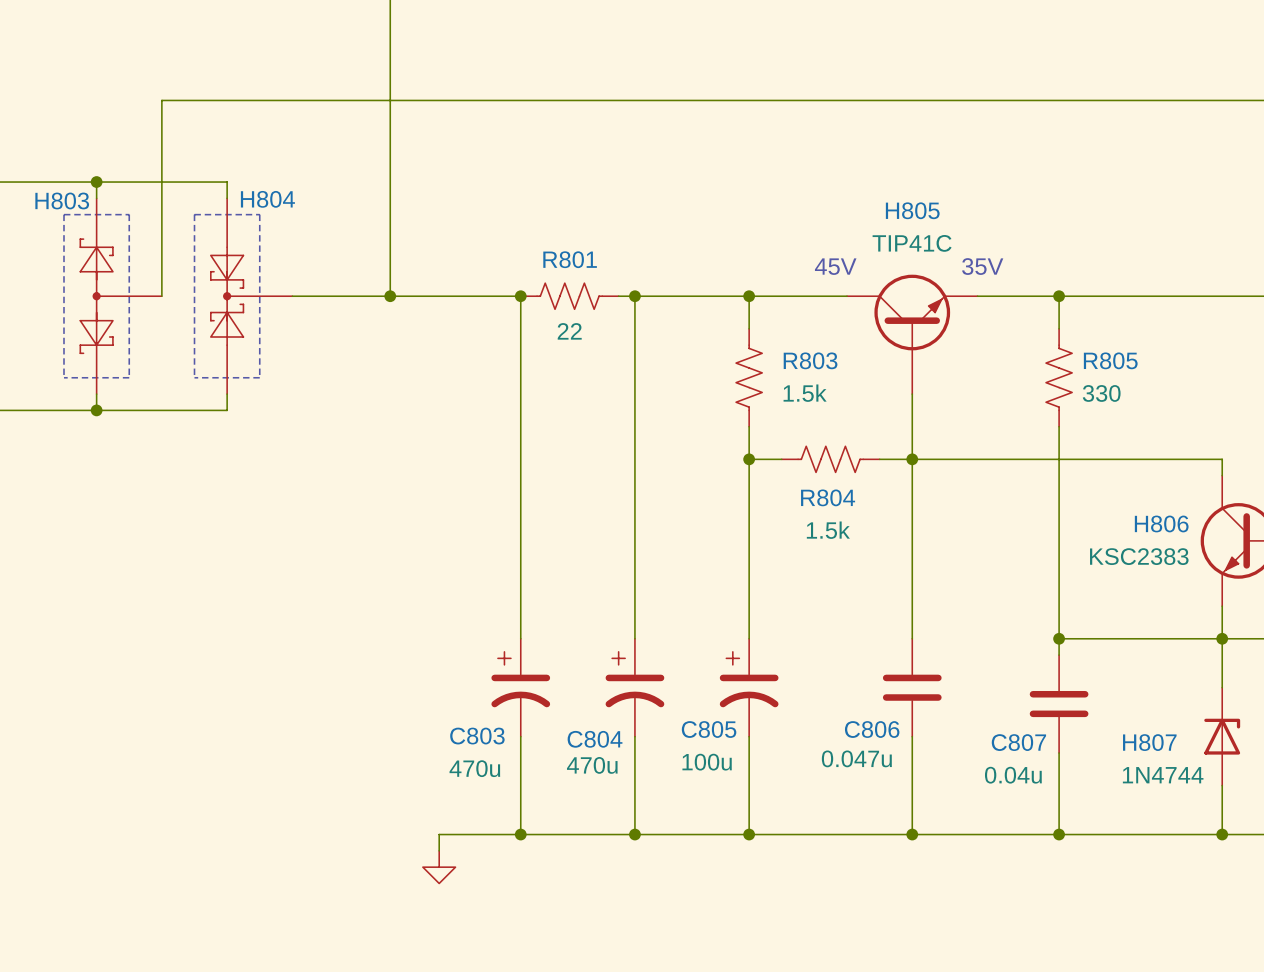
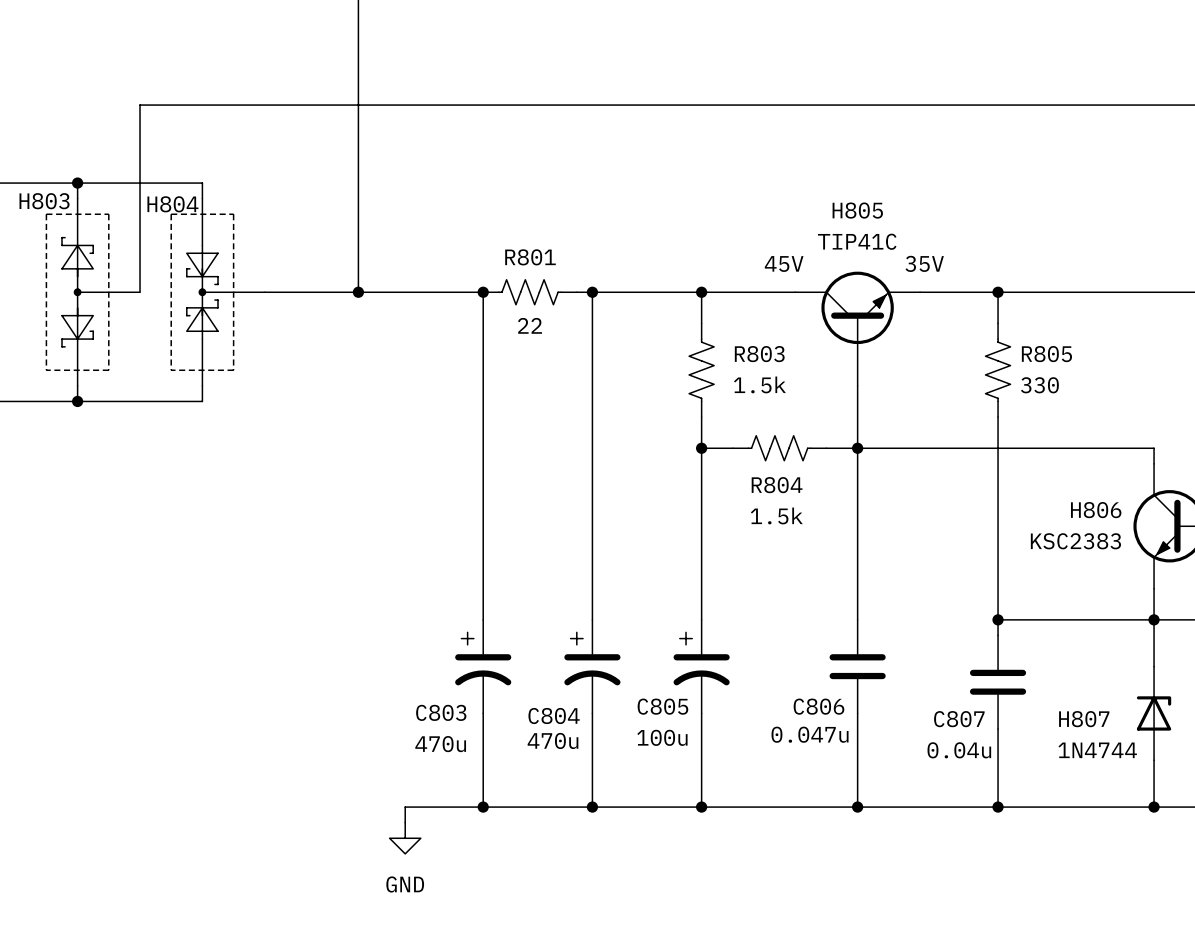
H804 name position: H804 (267, 199) -> H804 (172, 204)
power symbol text: none -> GND (405, 884)

